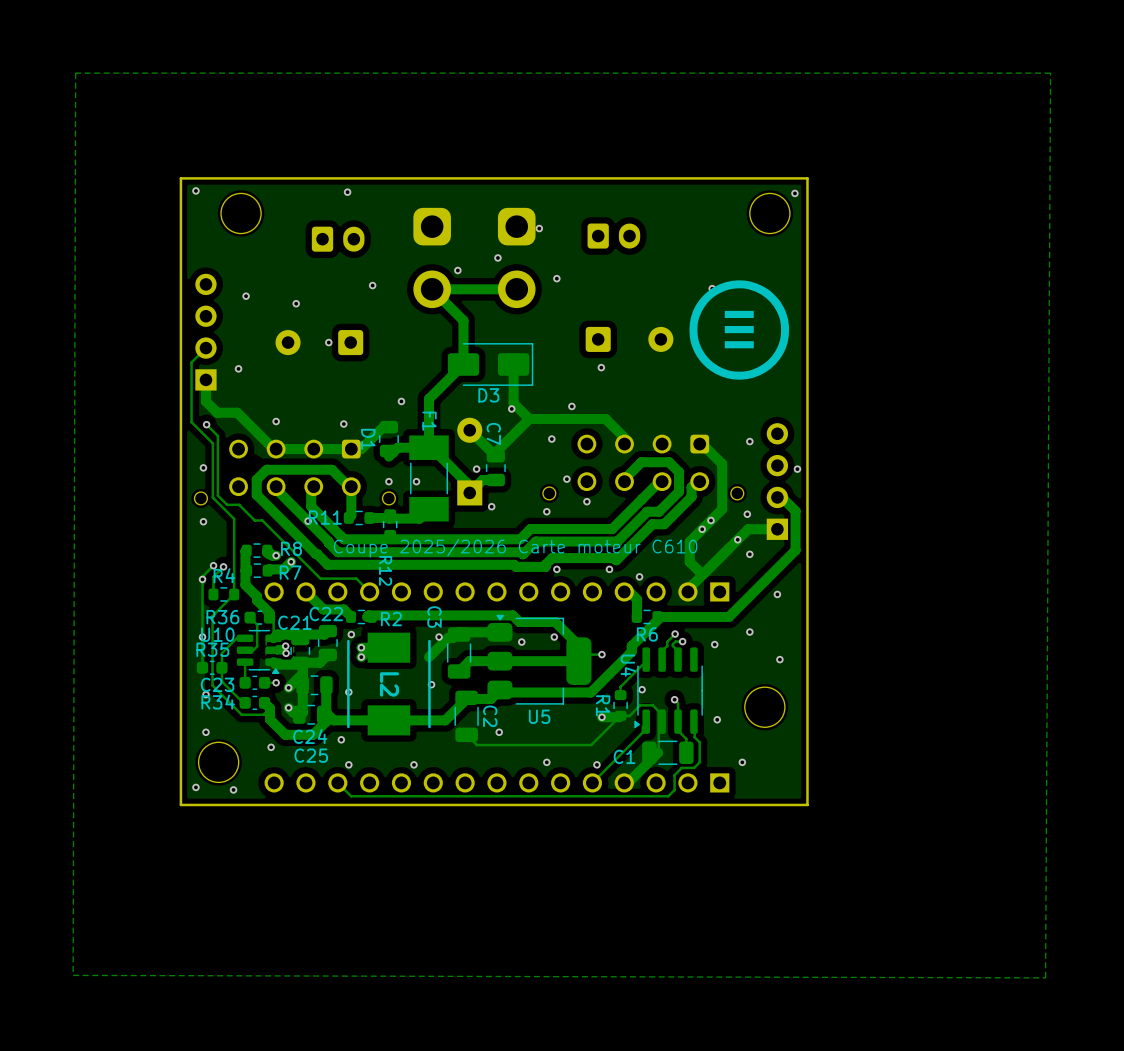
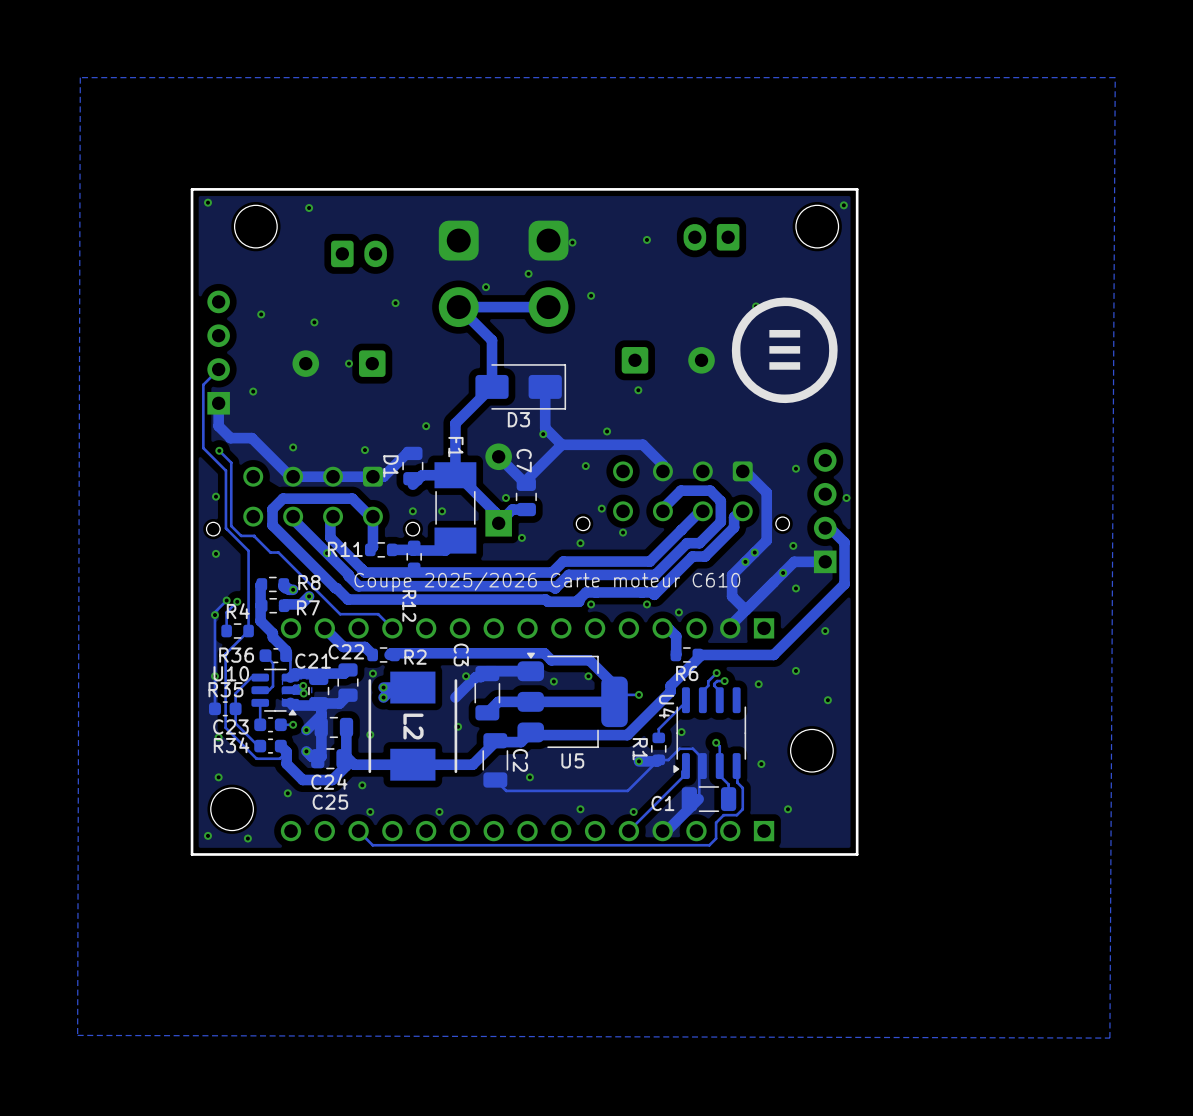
via position: (347, 192) -> (309, 208)
via: none -> (646, 239)
part rotation: 0° (613, 236) -> 180° (711, 237)
part position: (613, 236) -> (711, 237)

